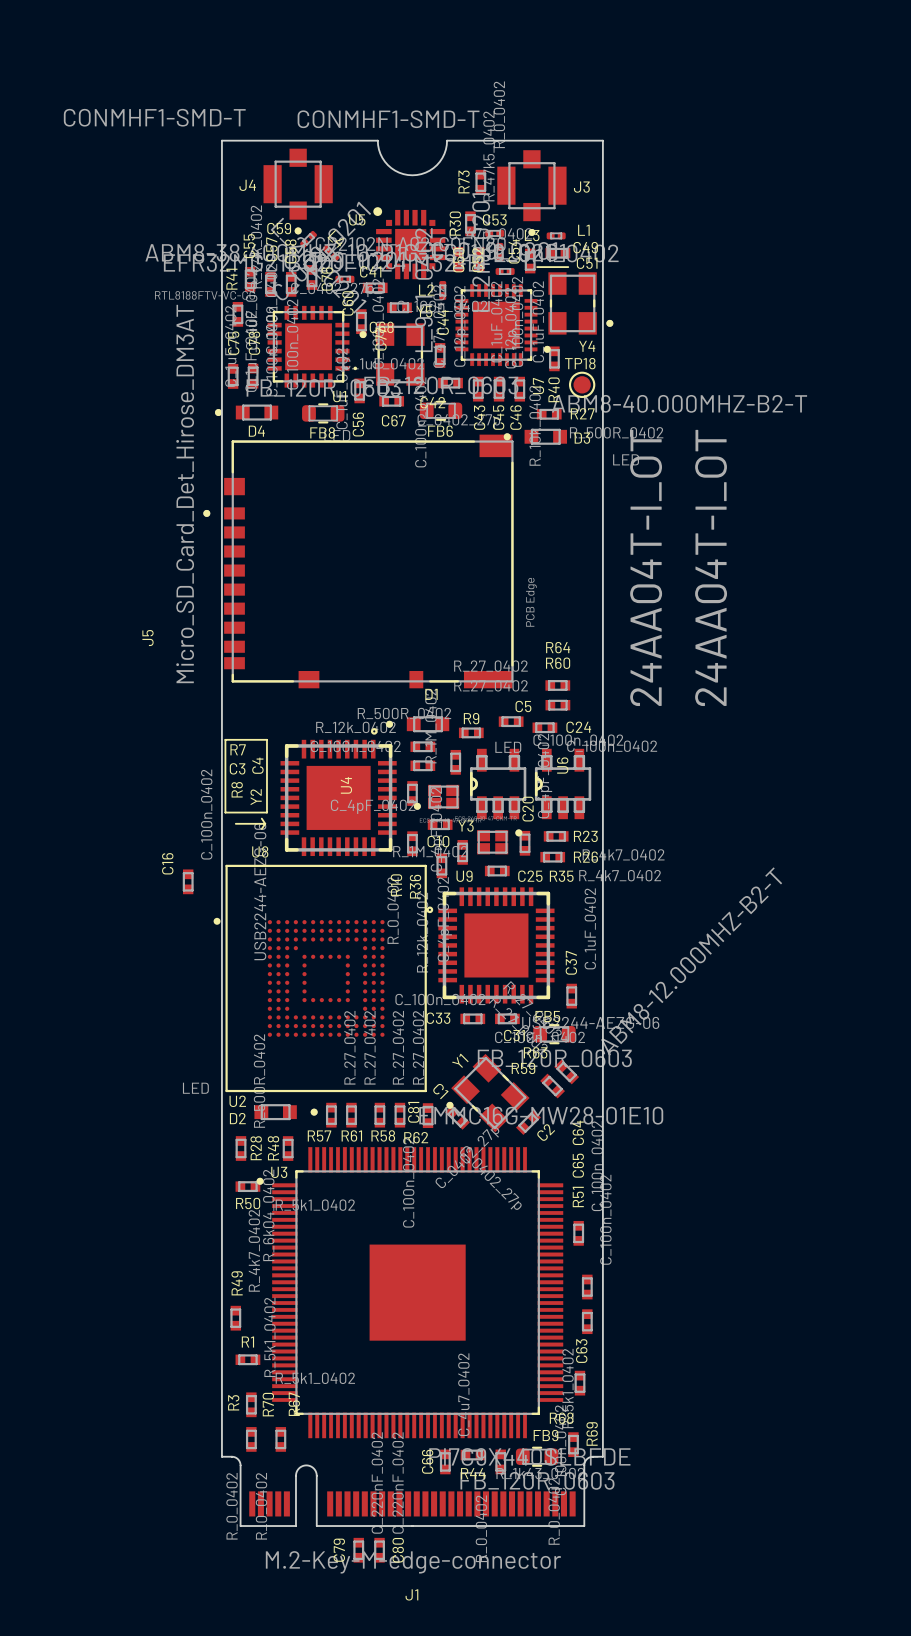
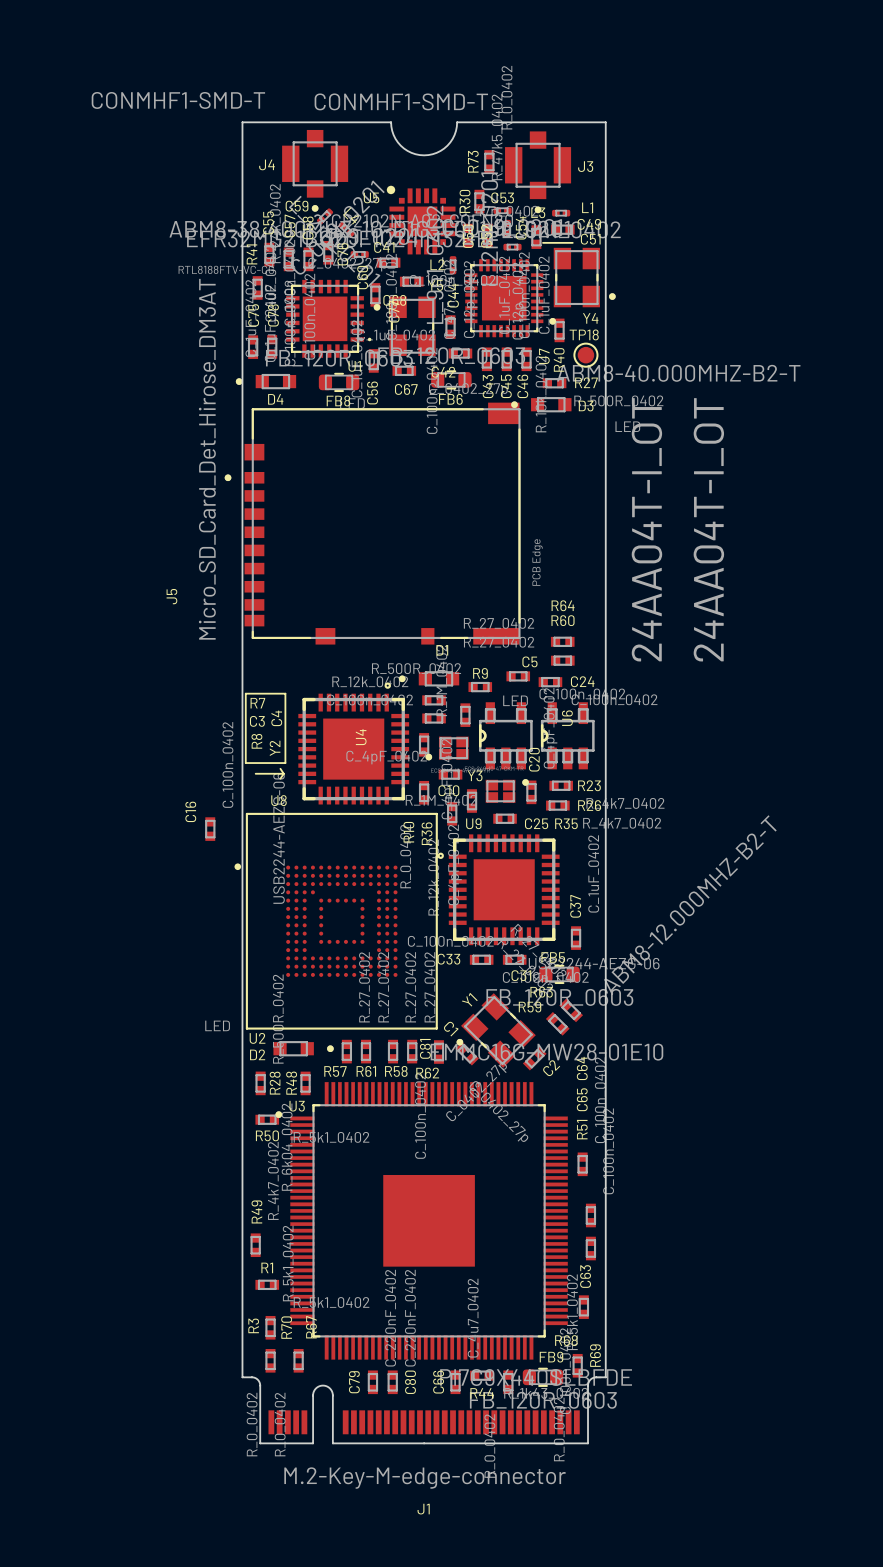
C79 position: (358, 1550) -> (372, 1382)
C80 position: (379, 1550) -> (392, 1382)

